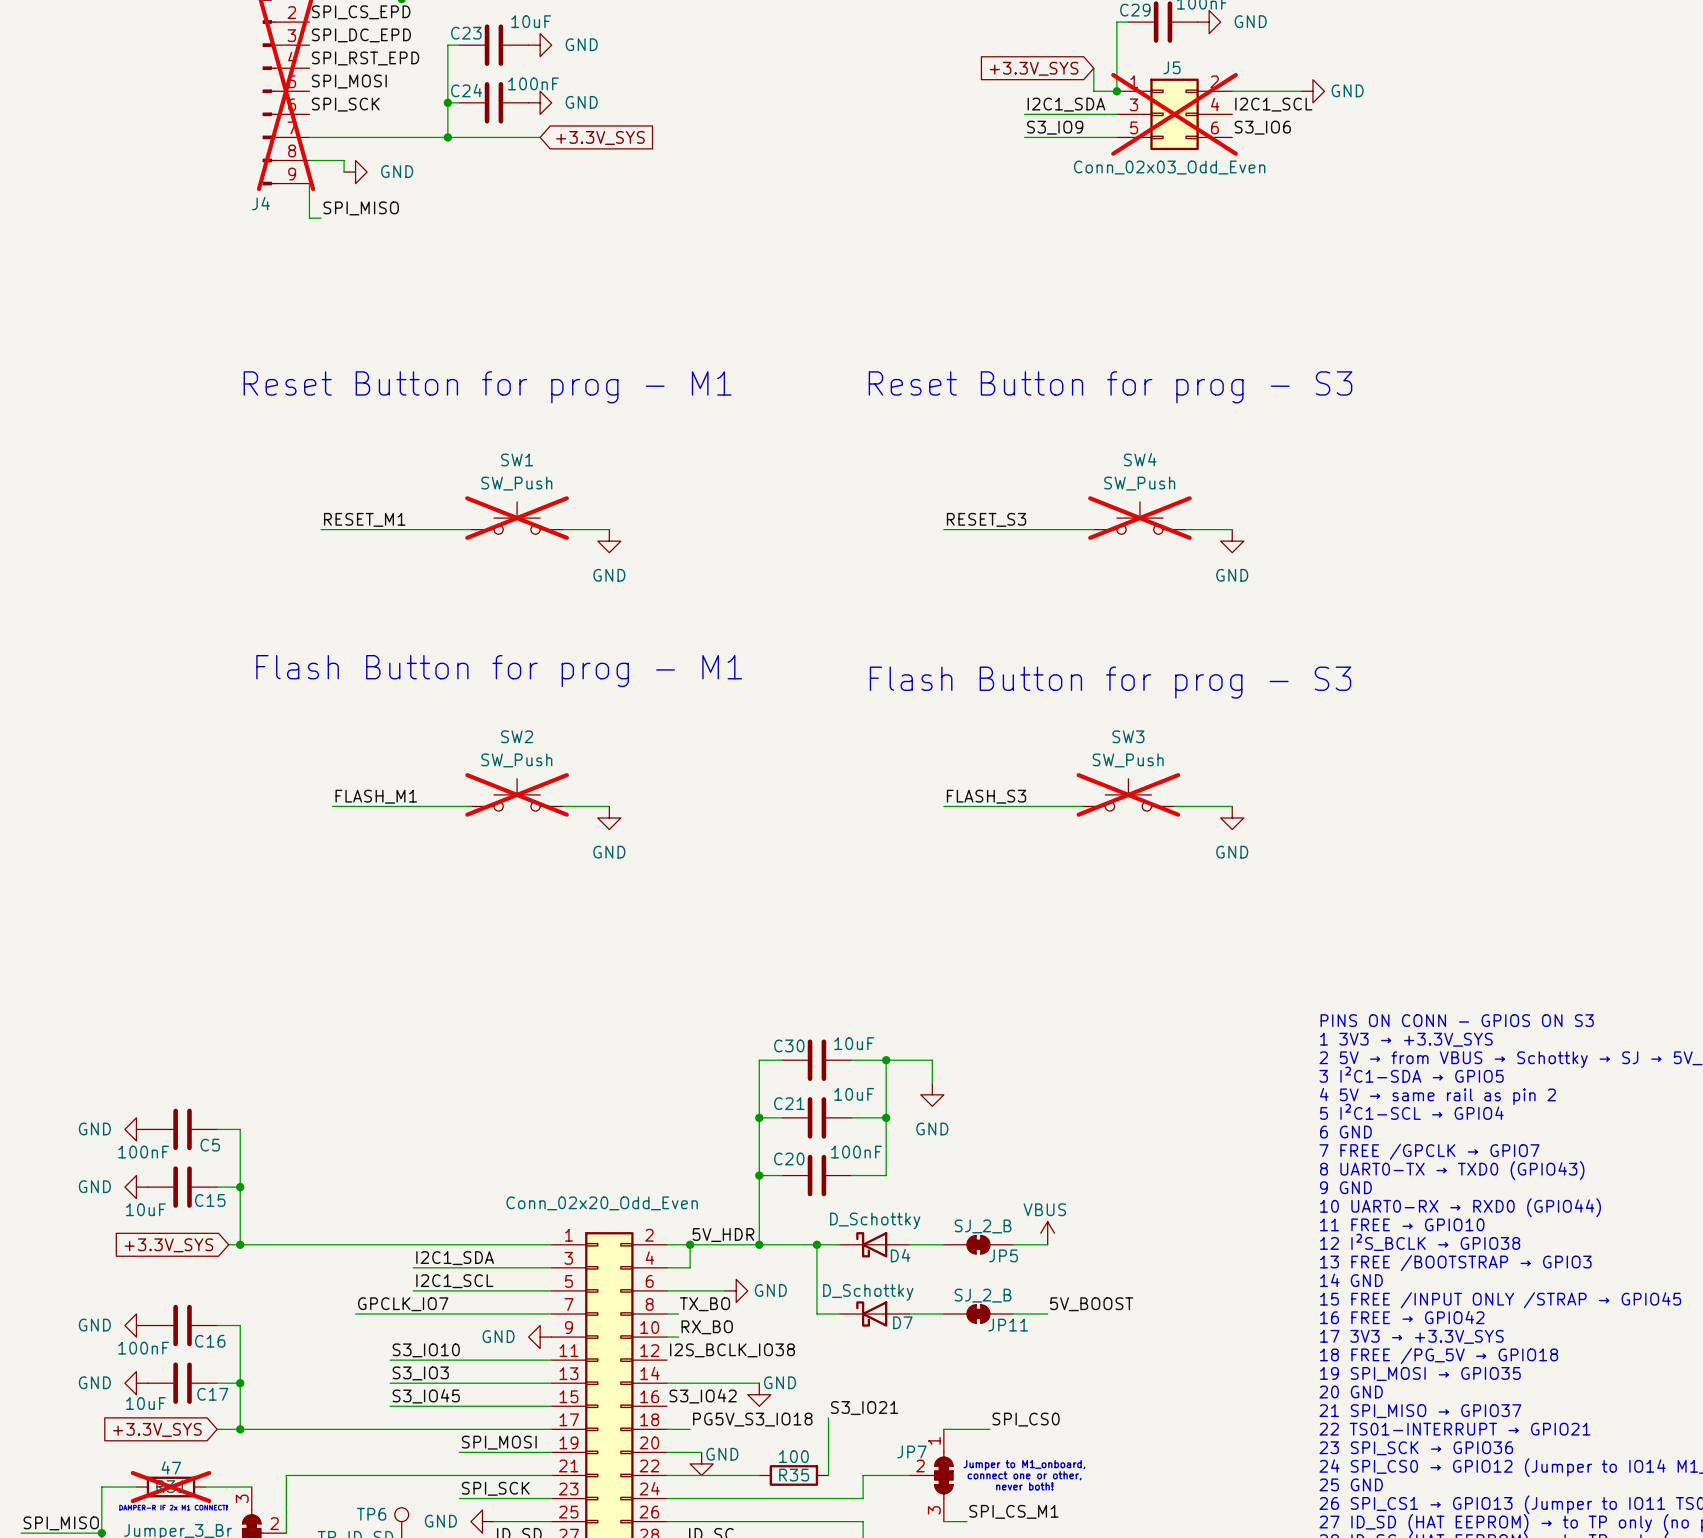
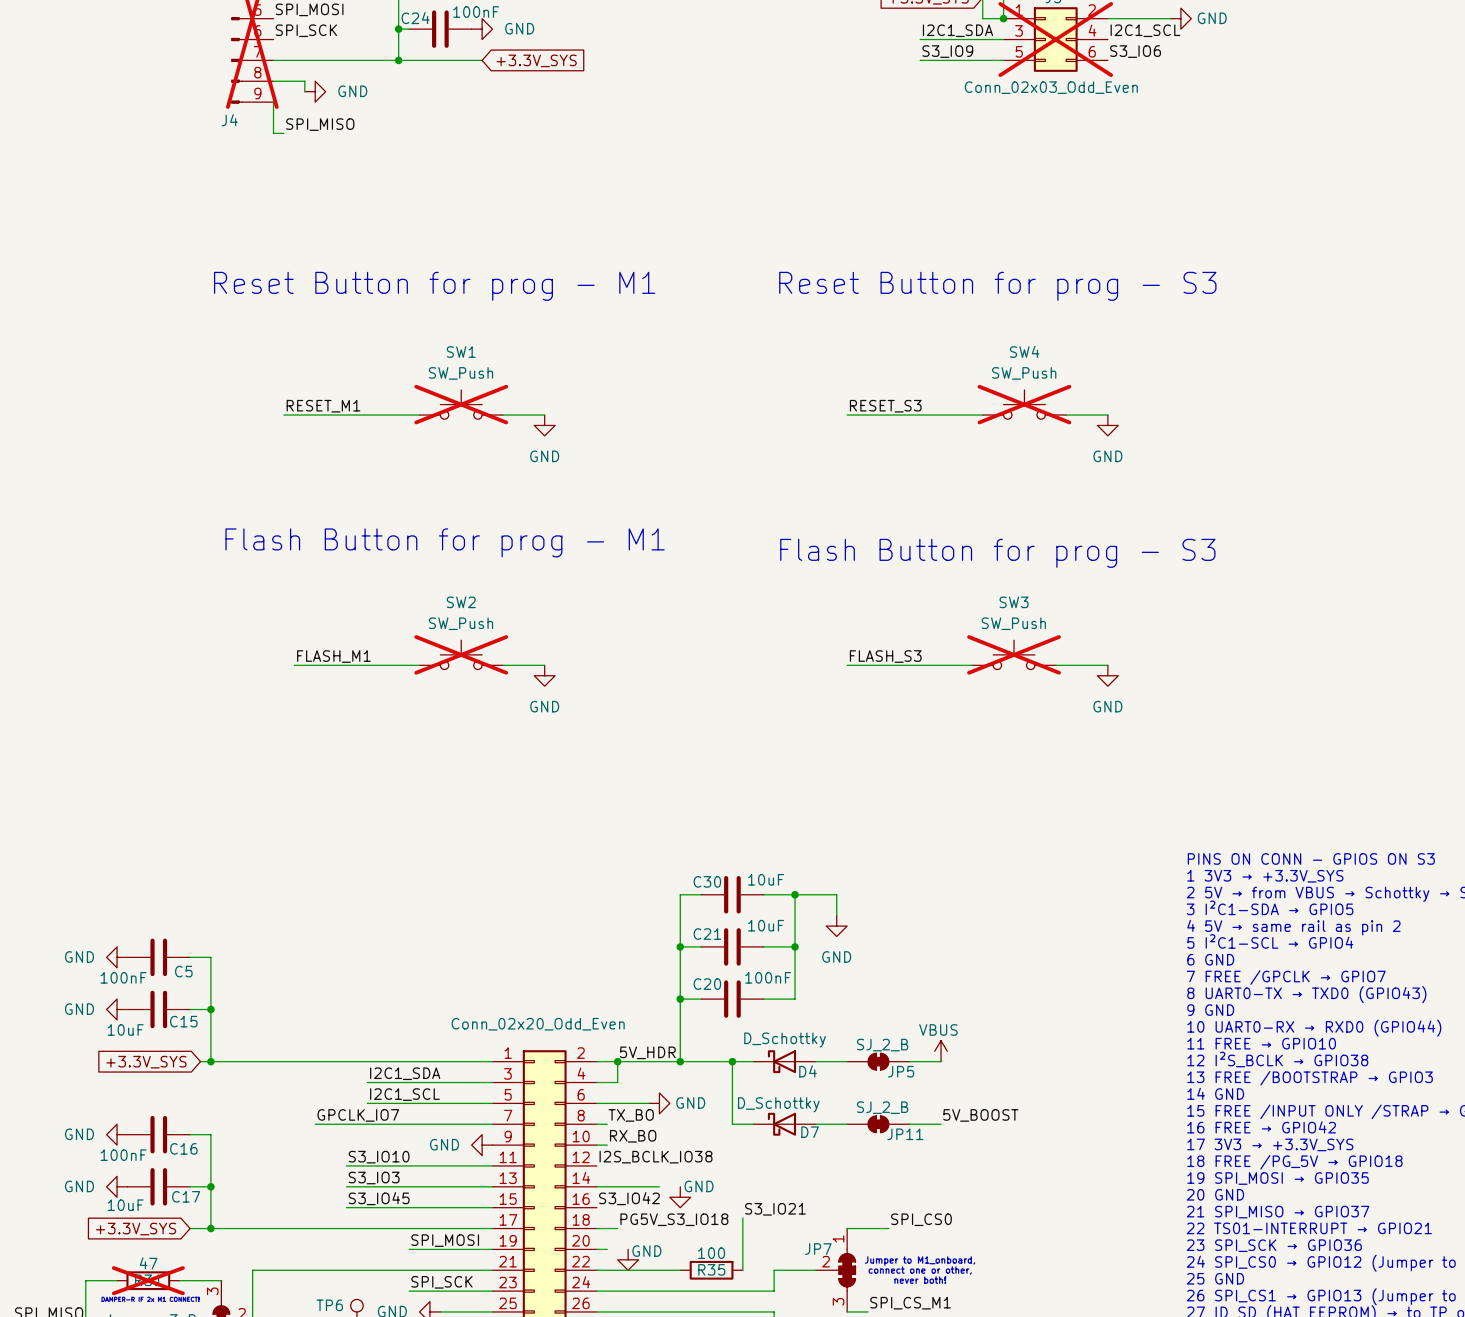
wire: (736, 1383) (759, 1383) -> none
wire: (678, 1452) (701, 1452) -> none

